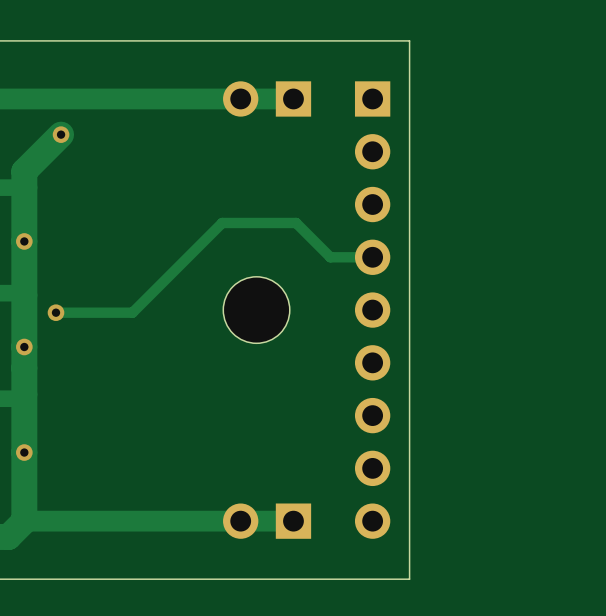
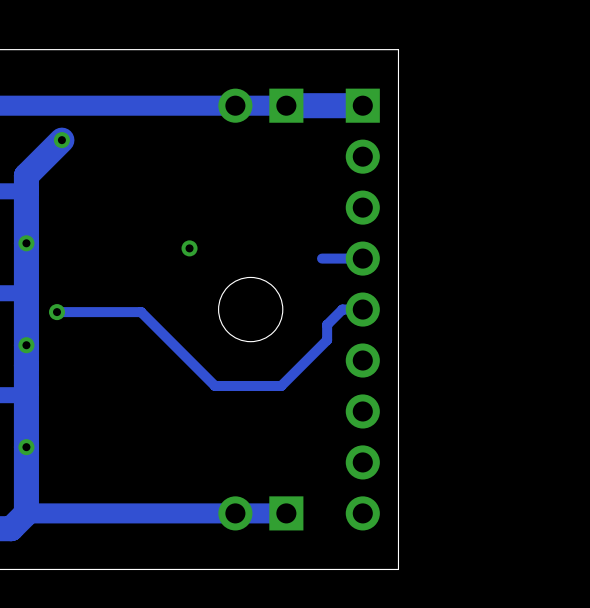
track: none -> (362, 105) (286, 105)
via: none -> (189, 248)
track: (330, 257) (296, 222) (222, 222) (132, 312) -> (362, 309) (342, 309) (327, 324) (327, 340) (281, 385) (215, 385) (141, 312) (130, 312)

